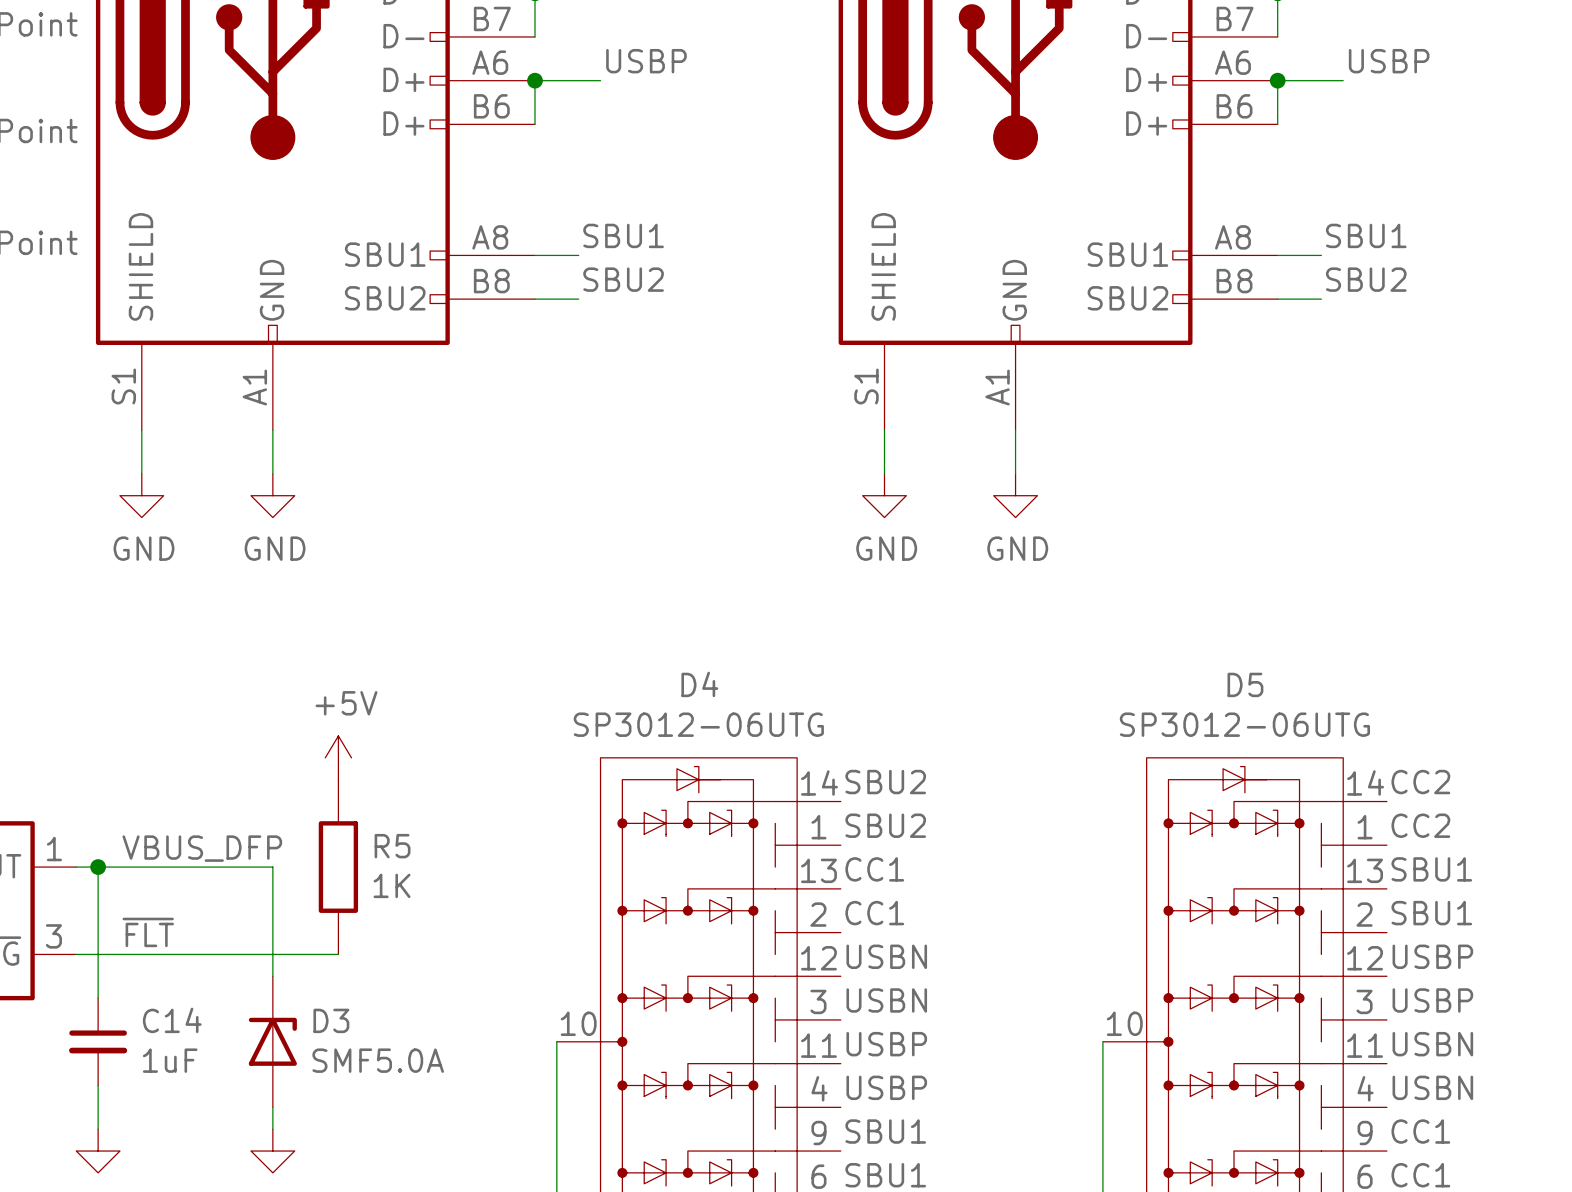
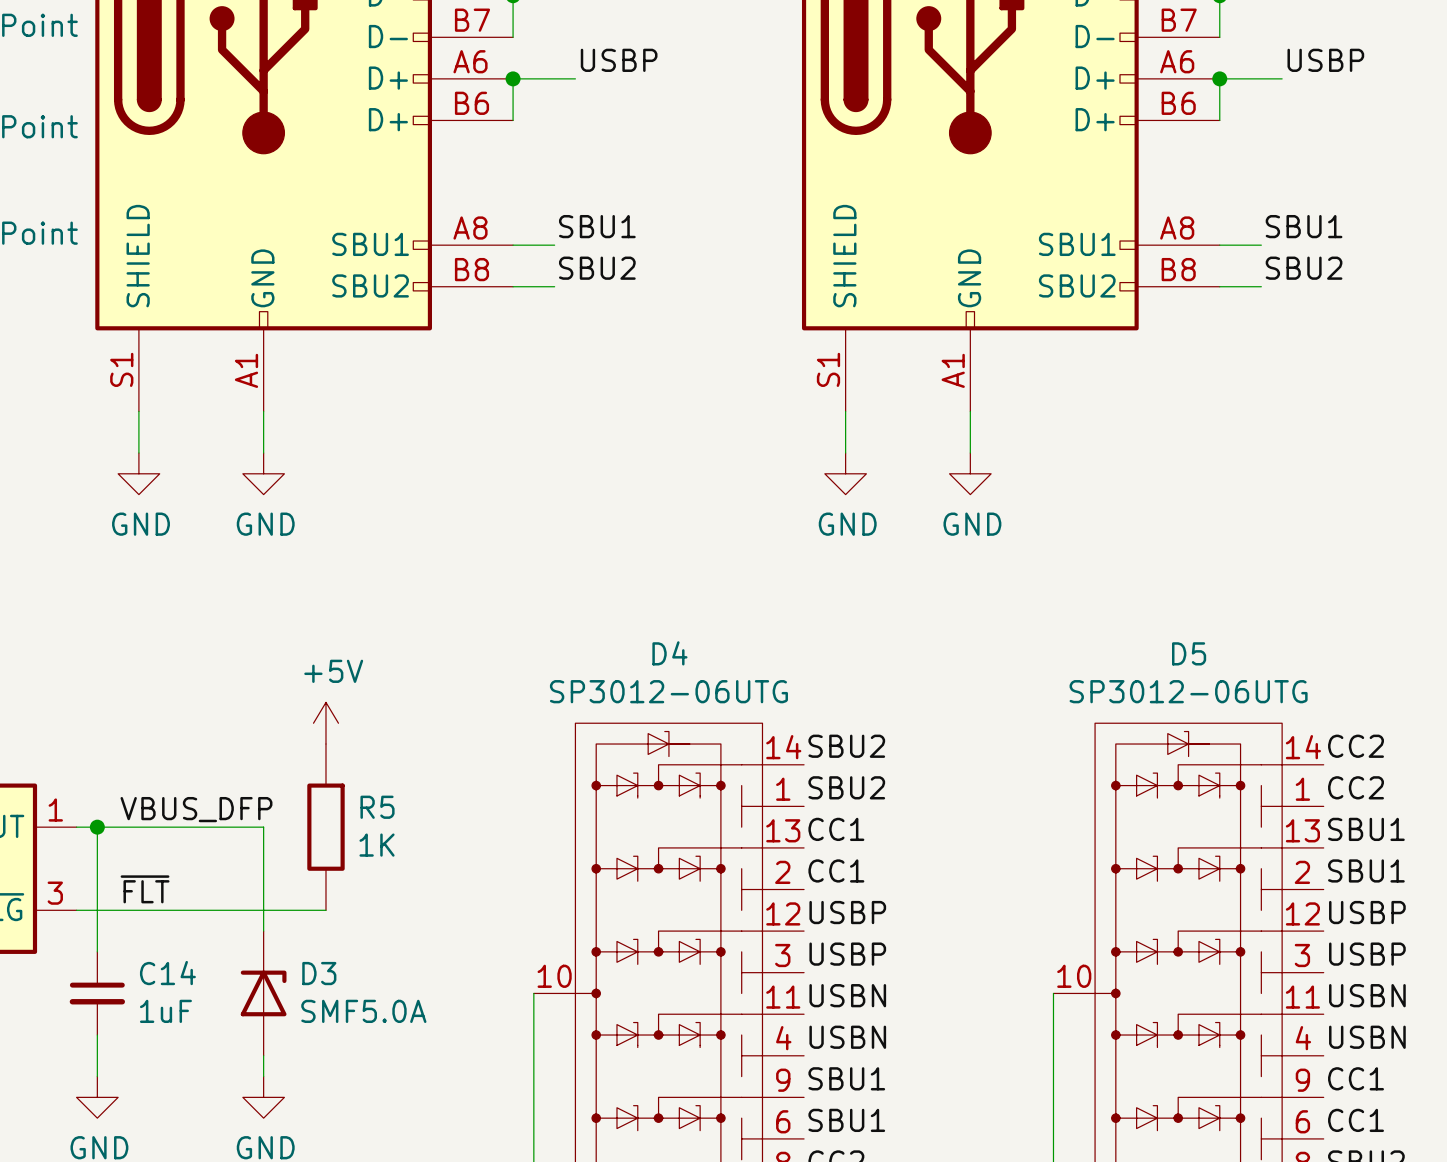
label: USBN (886, 956) -> USBP (847, 912)
label: USBN (886, 1000) -> USBP (847, 954)
label: USBP (886, 1044) -> USBN (847, 995)
label: USBP (886, 1087) -> USBN (847, 1037)

